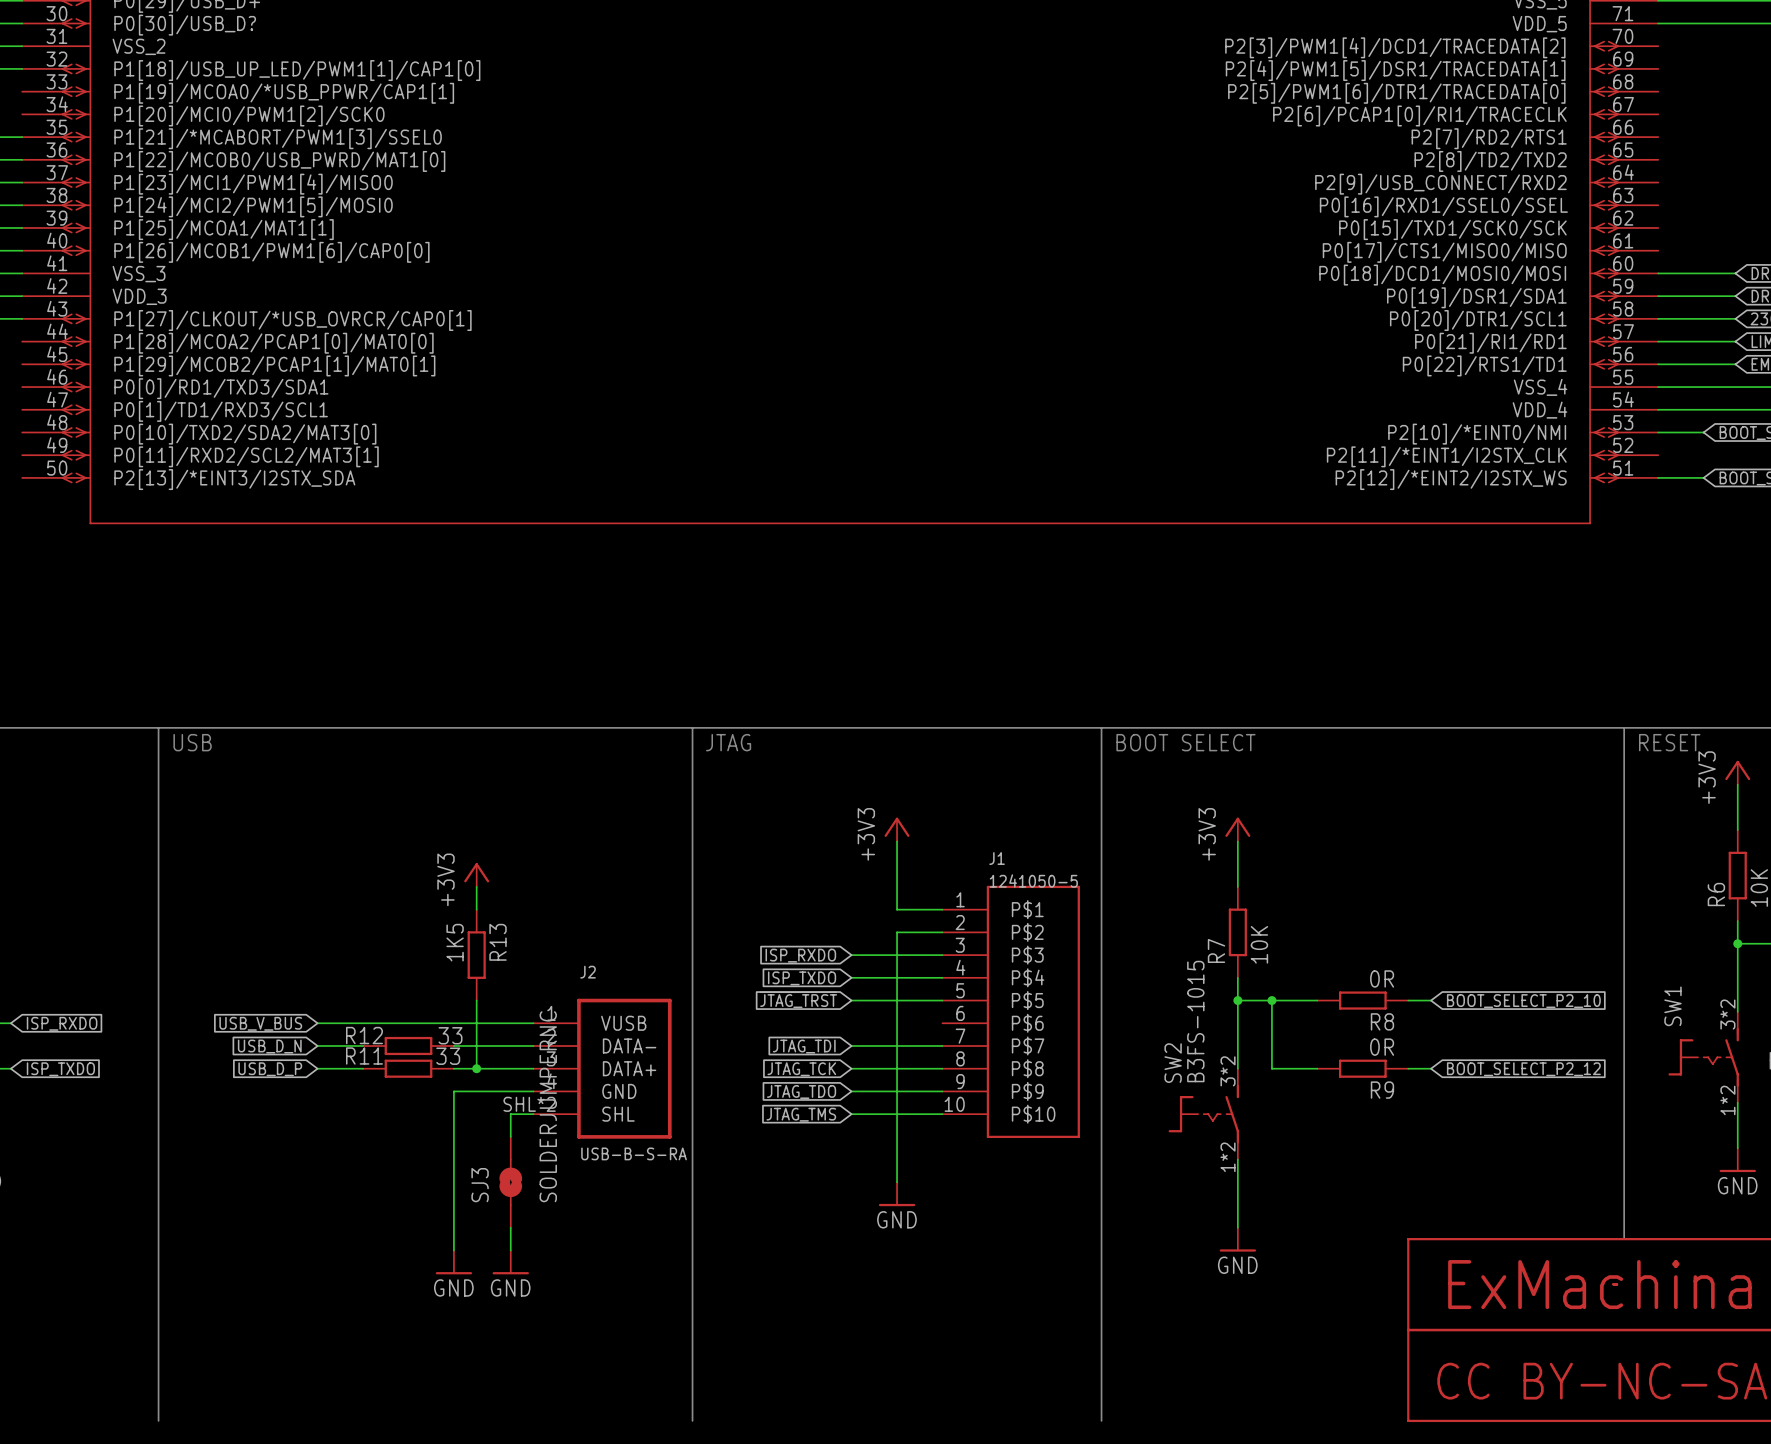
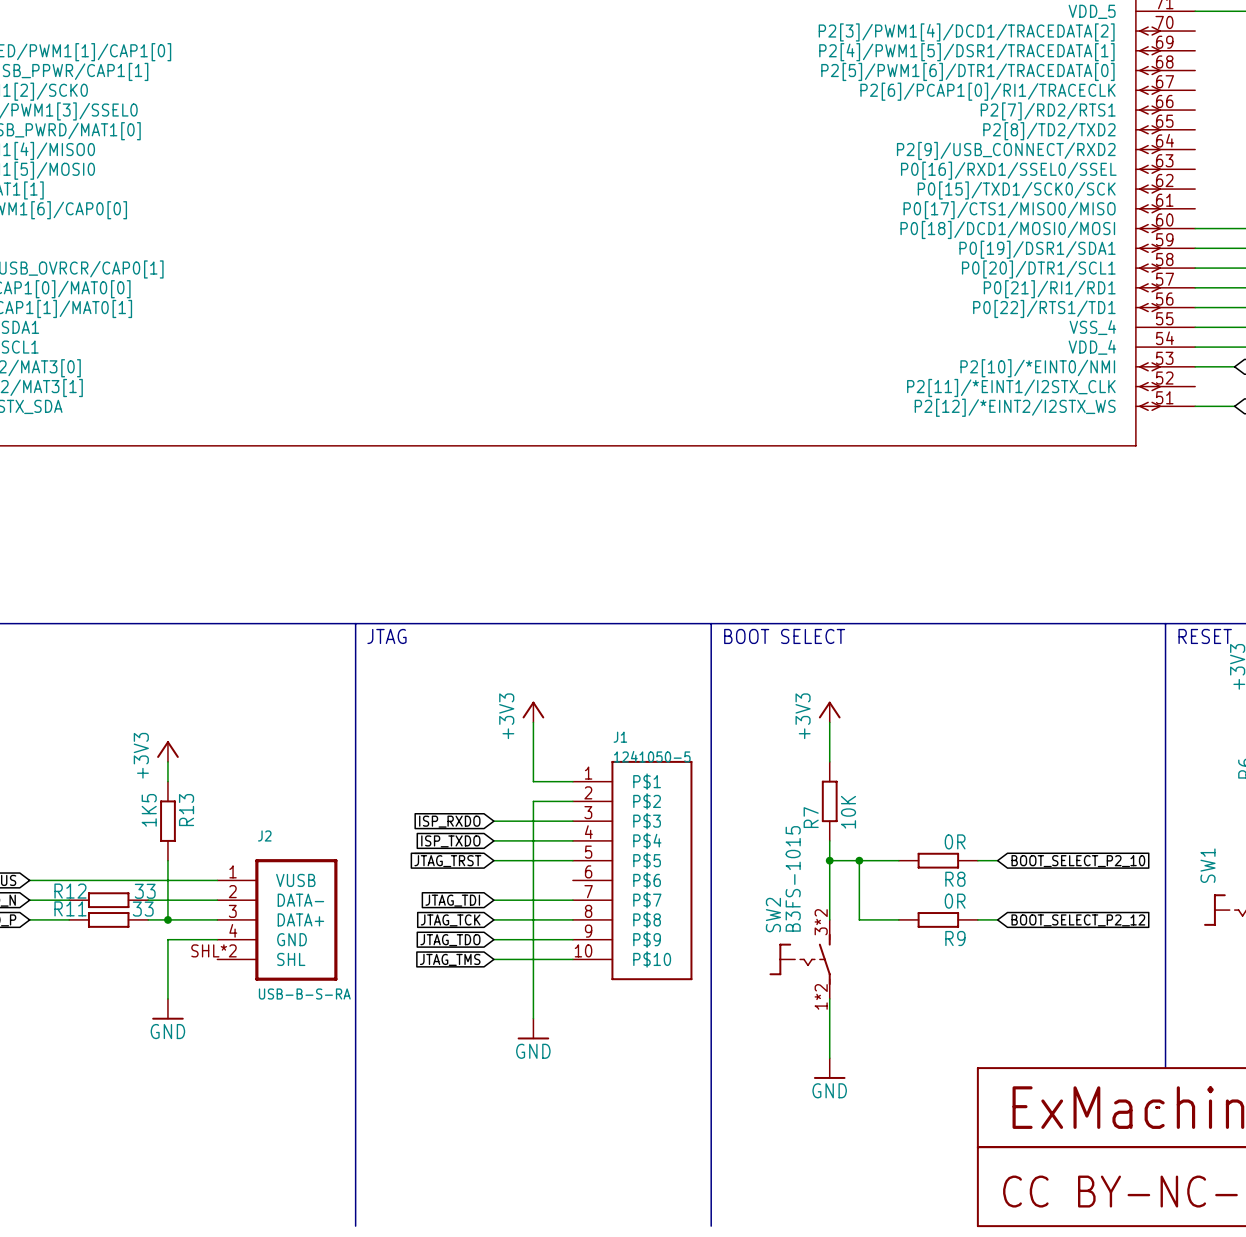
wire: (476, 1091) (453, 1091) (453, 1250) -> (167, 939) (167, 998)
wire: (533, 1114) (510, 1114) (510, 1136) -> none
power symbol: none -> GND (167, 1009)
SJ3: SOLDERJUMPERNC (510, 1182) -> none
wire: (510, 1227) (510, 1250) -> none
power symbol: GND (453, 1262) -> none
power symbol: GND (510, 1262) -> none

